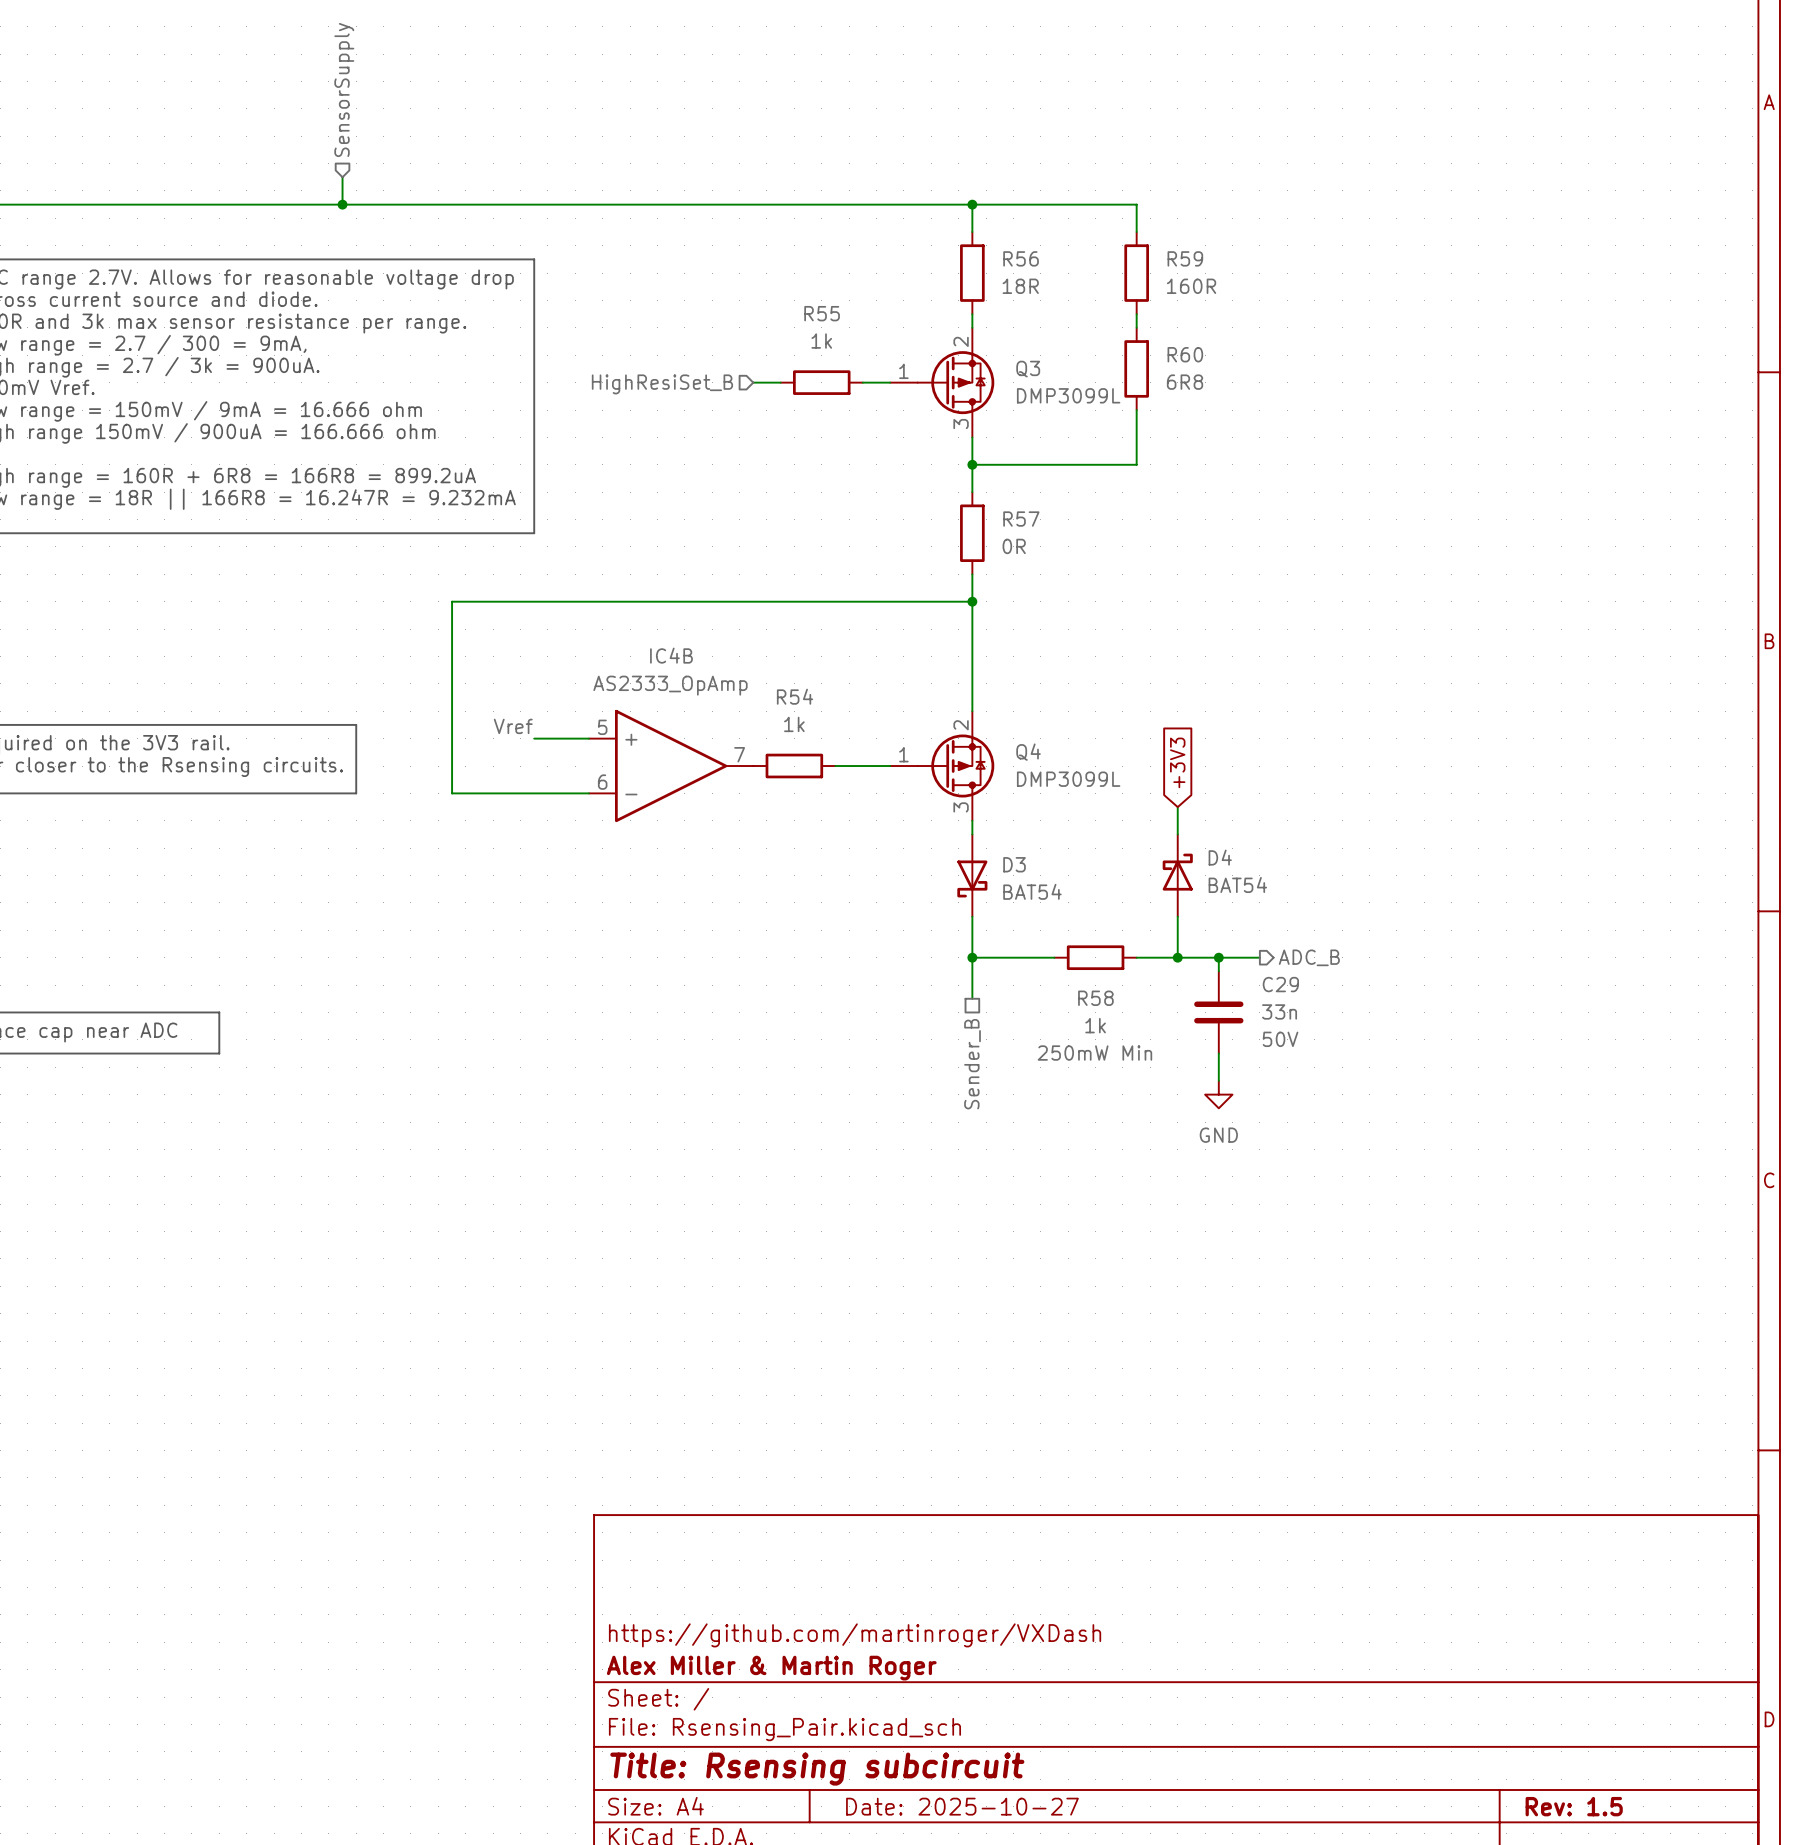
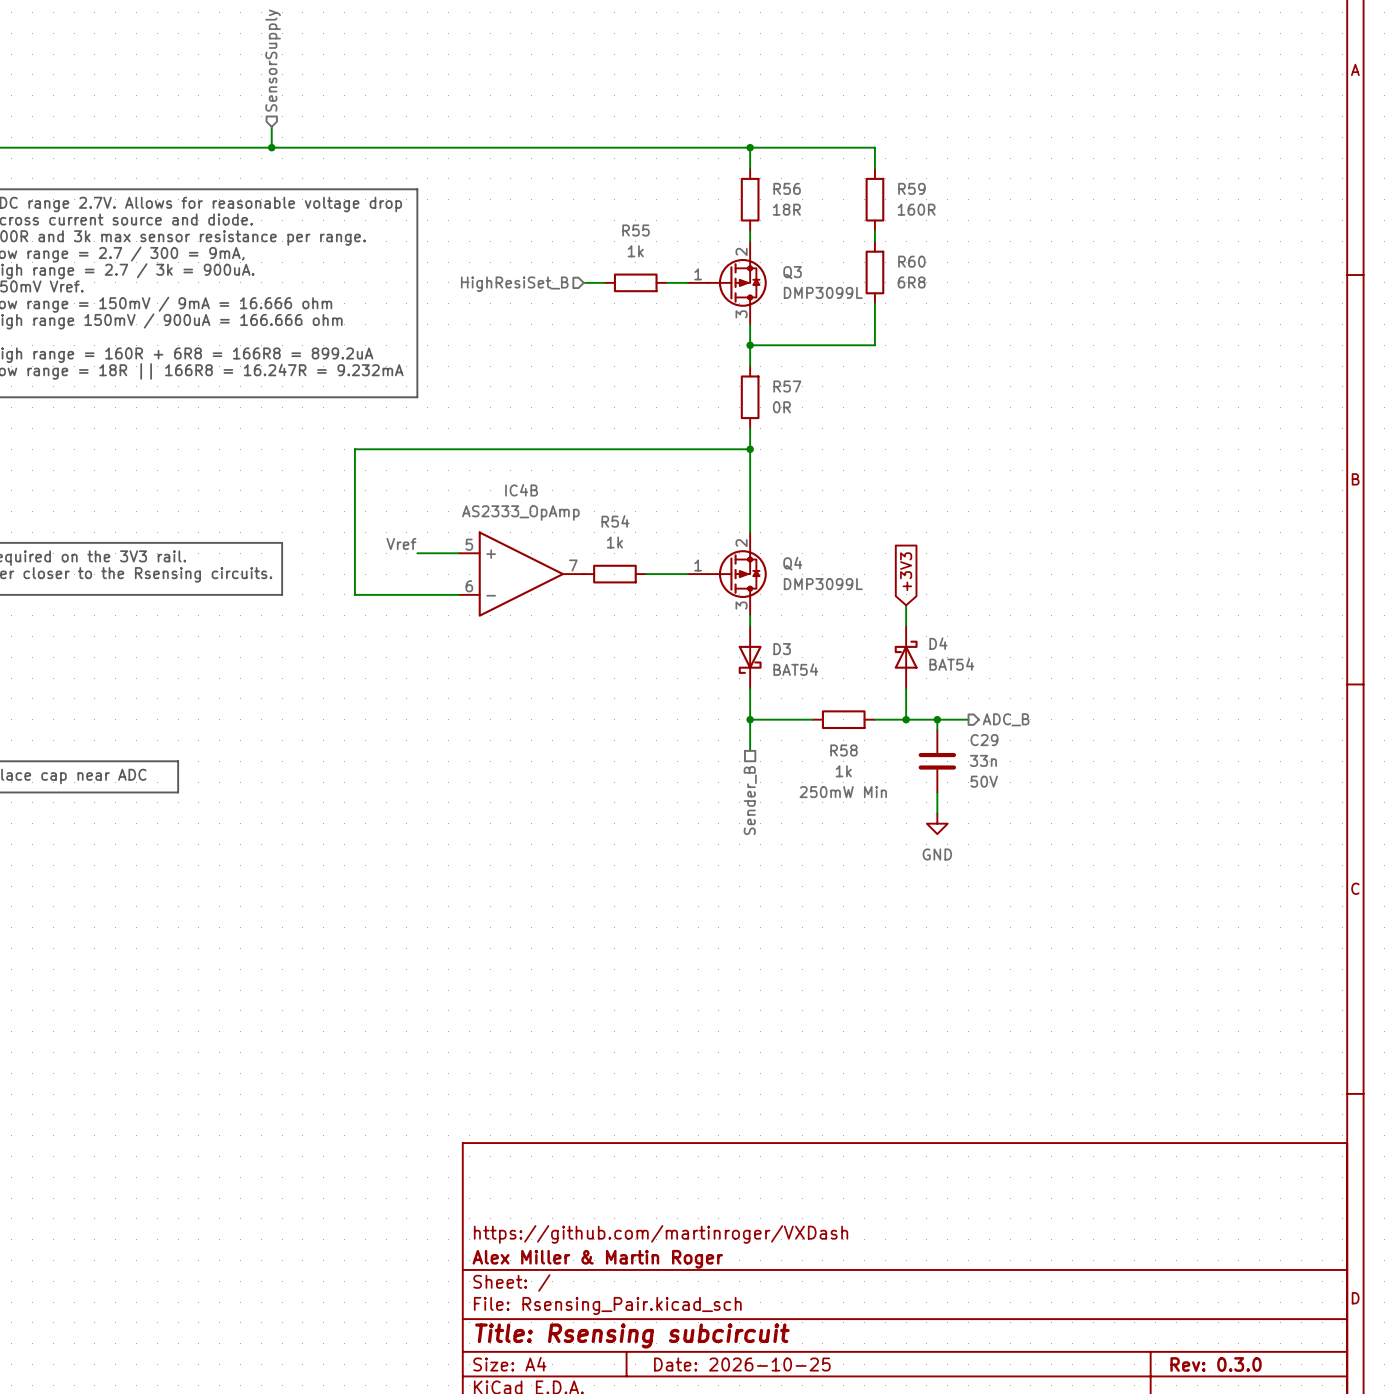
title block: Date: 2025-10-27 (962, 1806) -> Date: 2026-10-25 (742, 1364)
title block: Rev: 1.5 (1574, 1806) -> Rev: 0.3.0 (1216, 1364)

